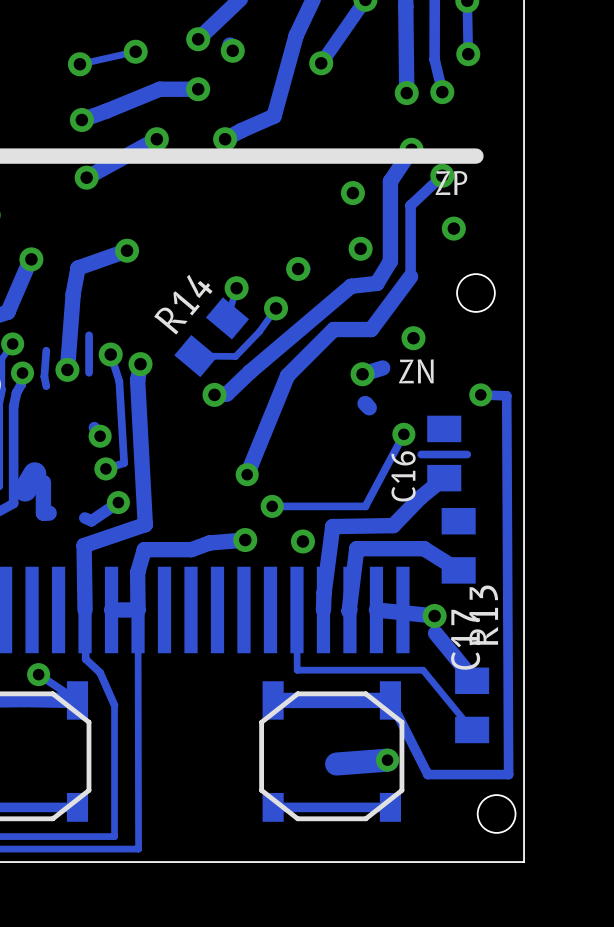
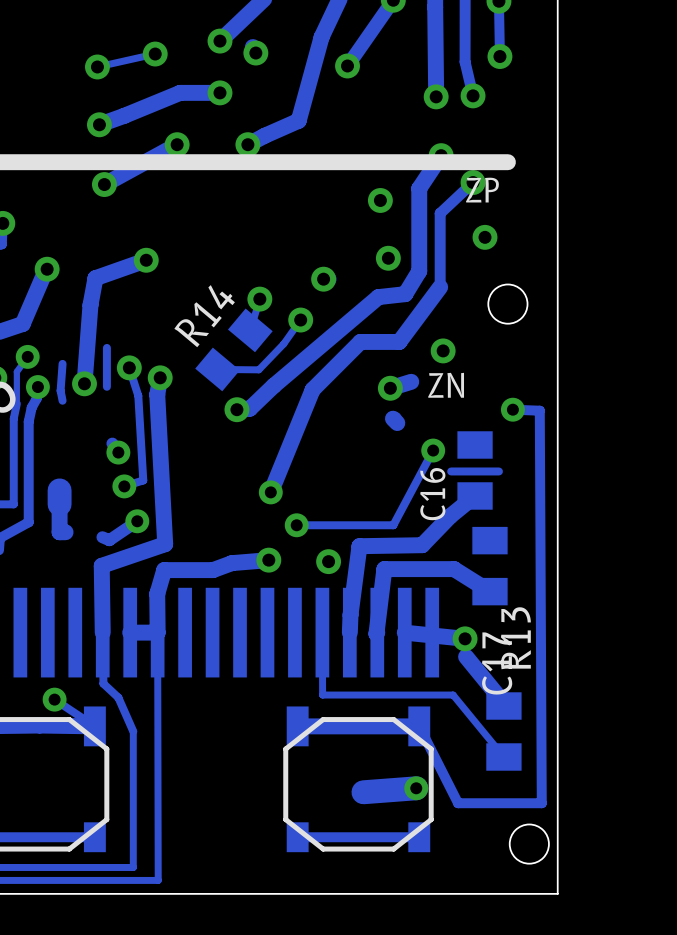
track: none -> (59, 490) (59, 504)
track: (34, 473) (25, 490) -> none

